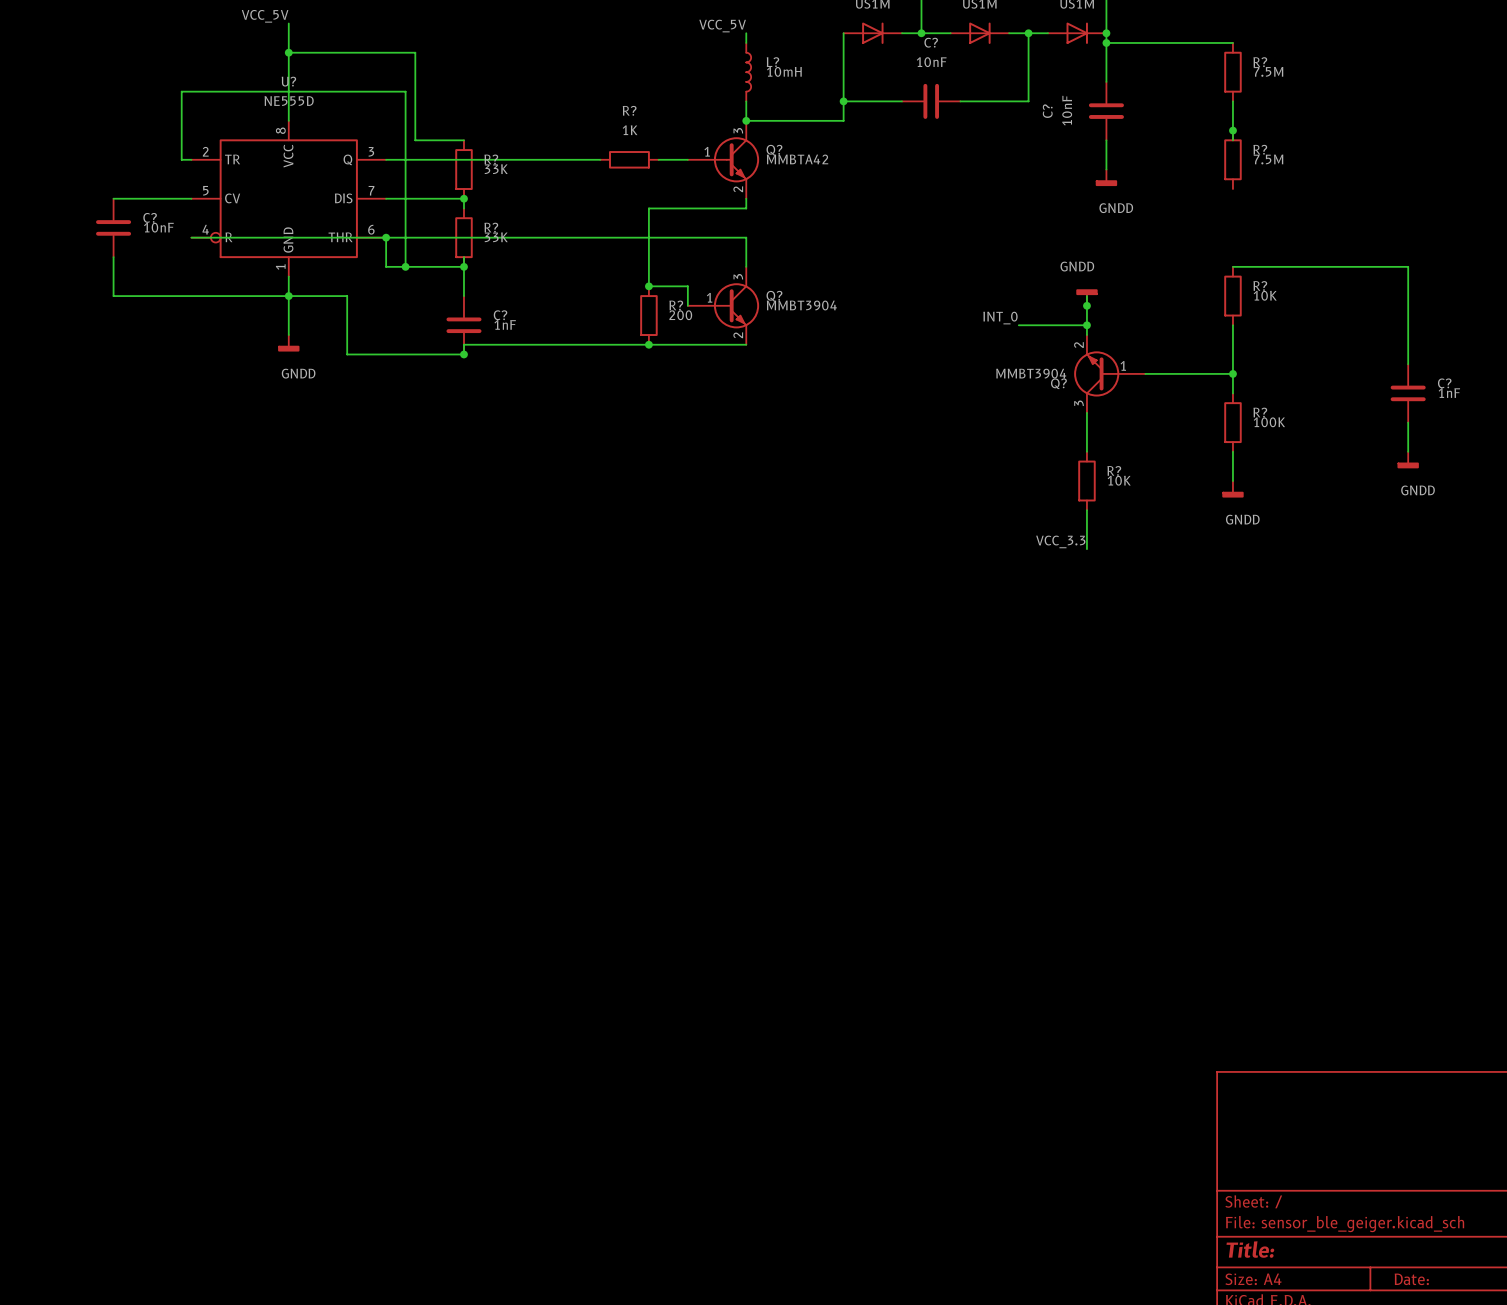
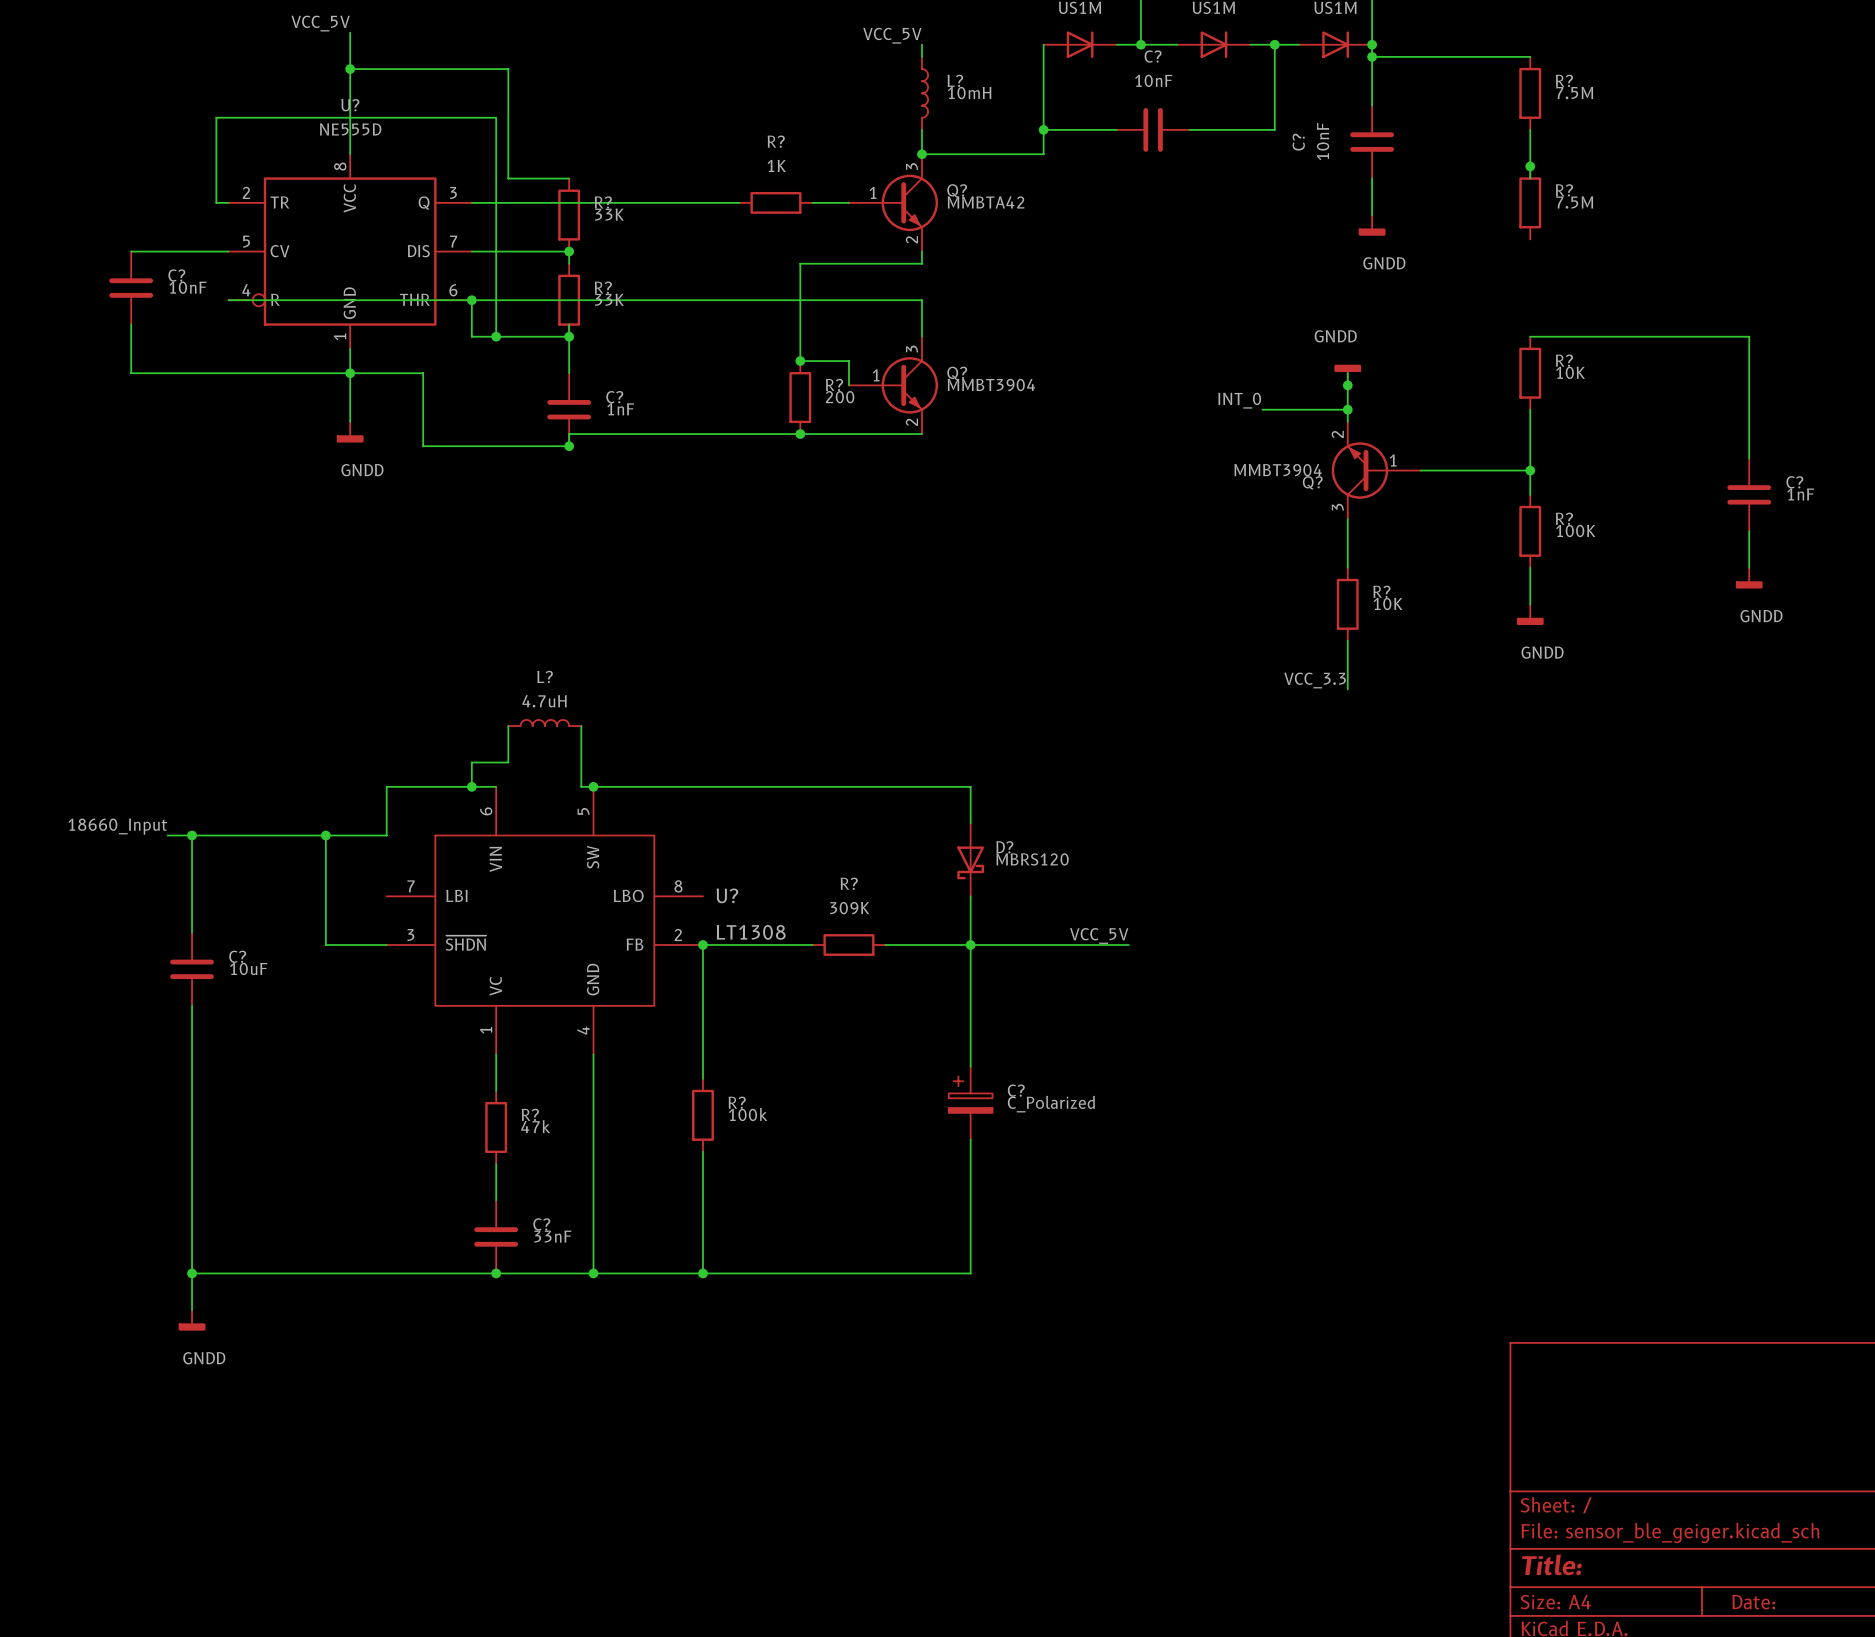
L?: none -> 4.7uH (544, 722)
wire: none -> (508, 726) (508, 762) (471, 762) (471, 786)
wire: none -> (581, 726) (581, 786) (970, 786) (970, 823)
junction: none -> (471, 786)
wire: none -> (496, 786) (386, 786) (386, 835) (167, 835)
junction: none -> (593, 786)
label: none -> 18660_Input (117, 826)
wire: none -> (192, 835) (192, 932)
junction: none -> (192, 835)
wire: none -> (325, 835) (325, 945) (386, 945)
junction: none -> (325, 835)
D?: none -> MBRS120 (970, 859)
wire: none -> (970, 896) (970, 1066)
U?: none -> LT1308 (544, 920)
label: none -> VCC_5V (1099, 935)
junction: none -> (702, 945)
wire: none -> (812, 945) (702, 945) (702, 1078)
R?: none -> 309K (848, 945)
wire: none -> (885, 945) (1128, 945)
junction: none -> (970, 945)
C?: none -> 10uF (192, 969)
wire: none -> (192, 1005) (192, 1309)
wire: none -> (496, 1054) (496, 1090)
wire: none -> (593, 1054) (593, 1273)
C?: none -> C_Polarized (970, 1103)
R?: none -> 100k (702, 1115)
R?: none -> 47k (496, 1127)
wire: none -> (970, 1139) (970, 1273) (192, 1273)
wire: none -> (702, 1151) (702, 1273)
wire: none -> (496, 1163) (496, 1200)
C?: none -> 33nF (496, 1236)
junction: none -> (192, 1273)
junction: none -> (496, 1273)
junction: none -> (593, 1273)
junction: none -> (702, 1273)
power symbol: none -> GNDD (192, 1320)

